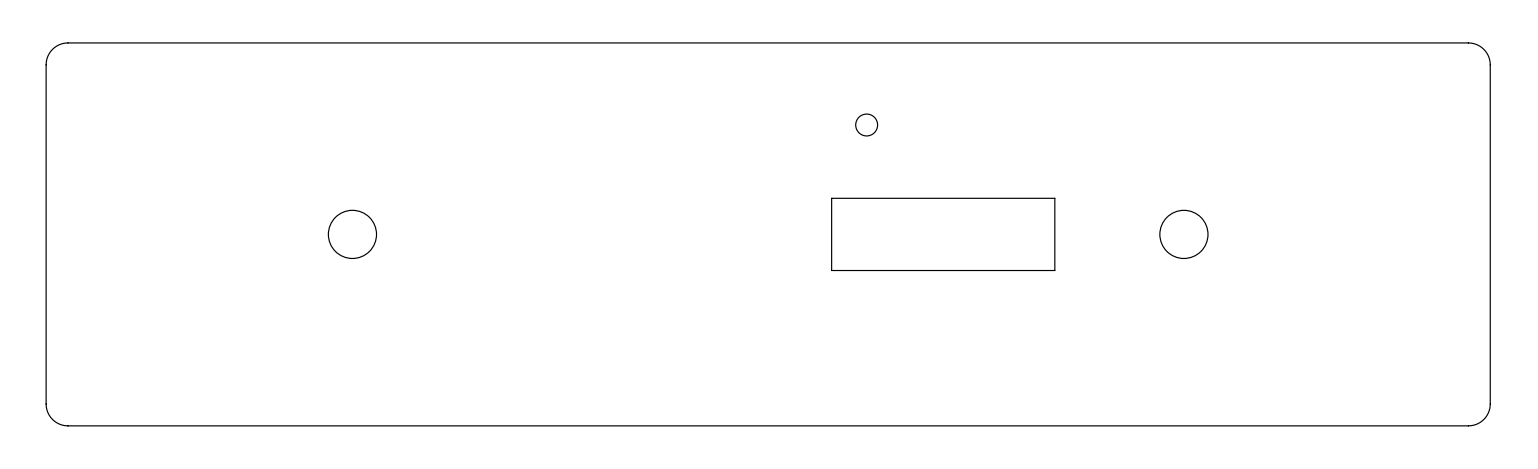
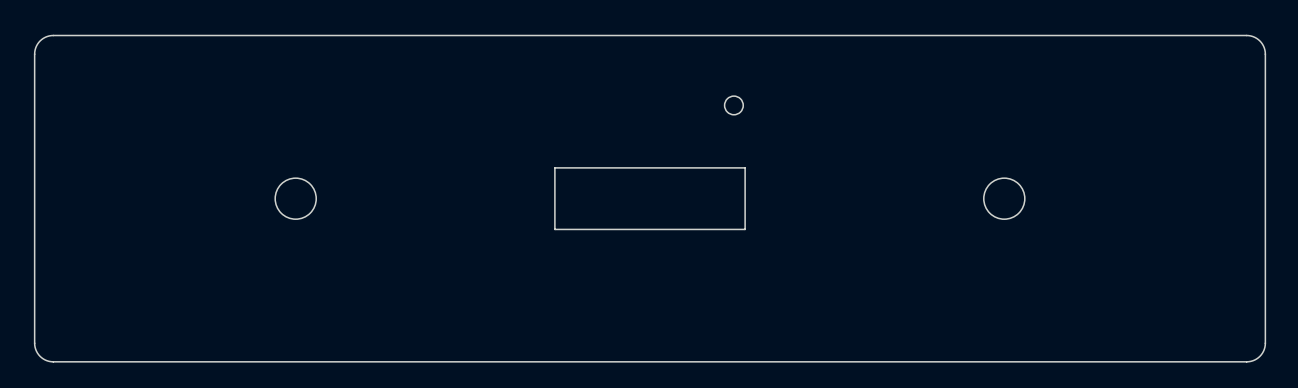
board edge: (831, 198) (831, 270) -> (704, 167) (554, 167) (554, 229) (704, 229)
board edge: (879, 198) (1054, 198) (1054, 270) (879, 270) -> (745, 167) (745, 229)

